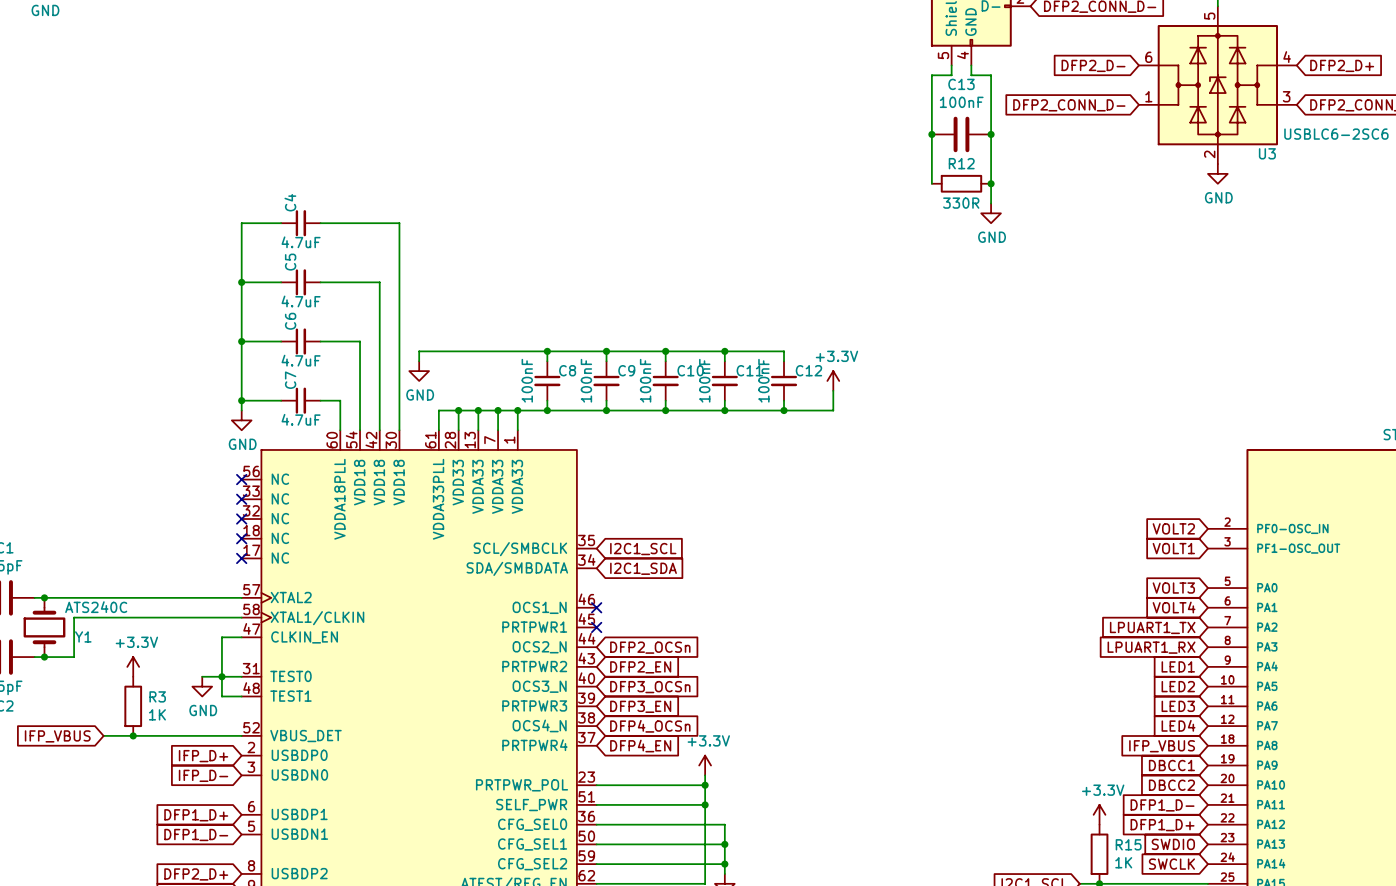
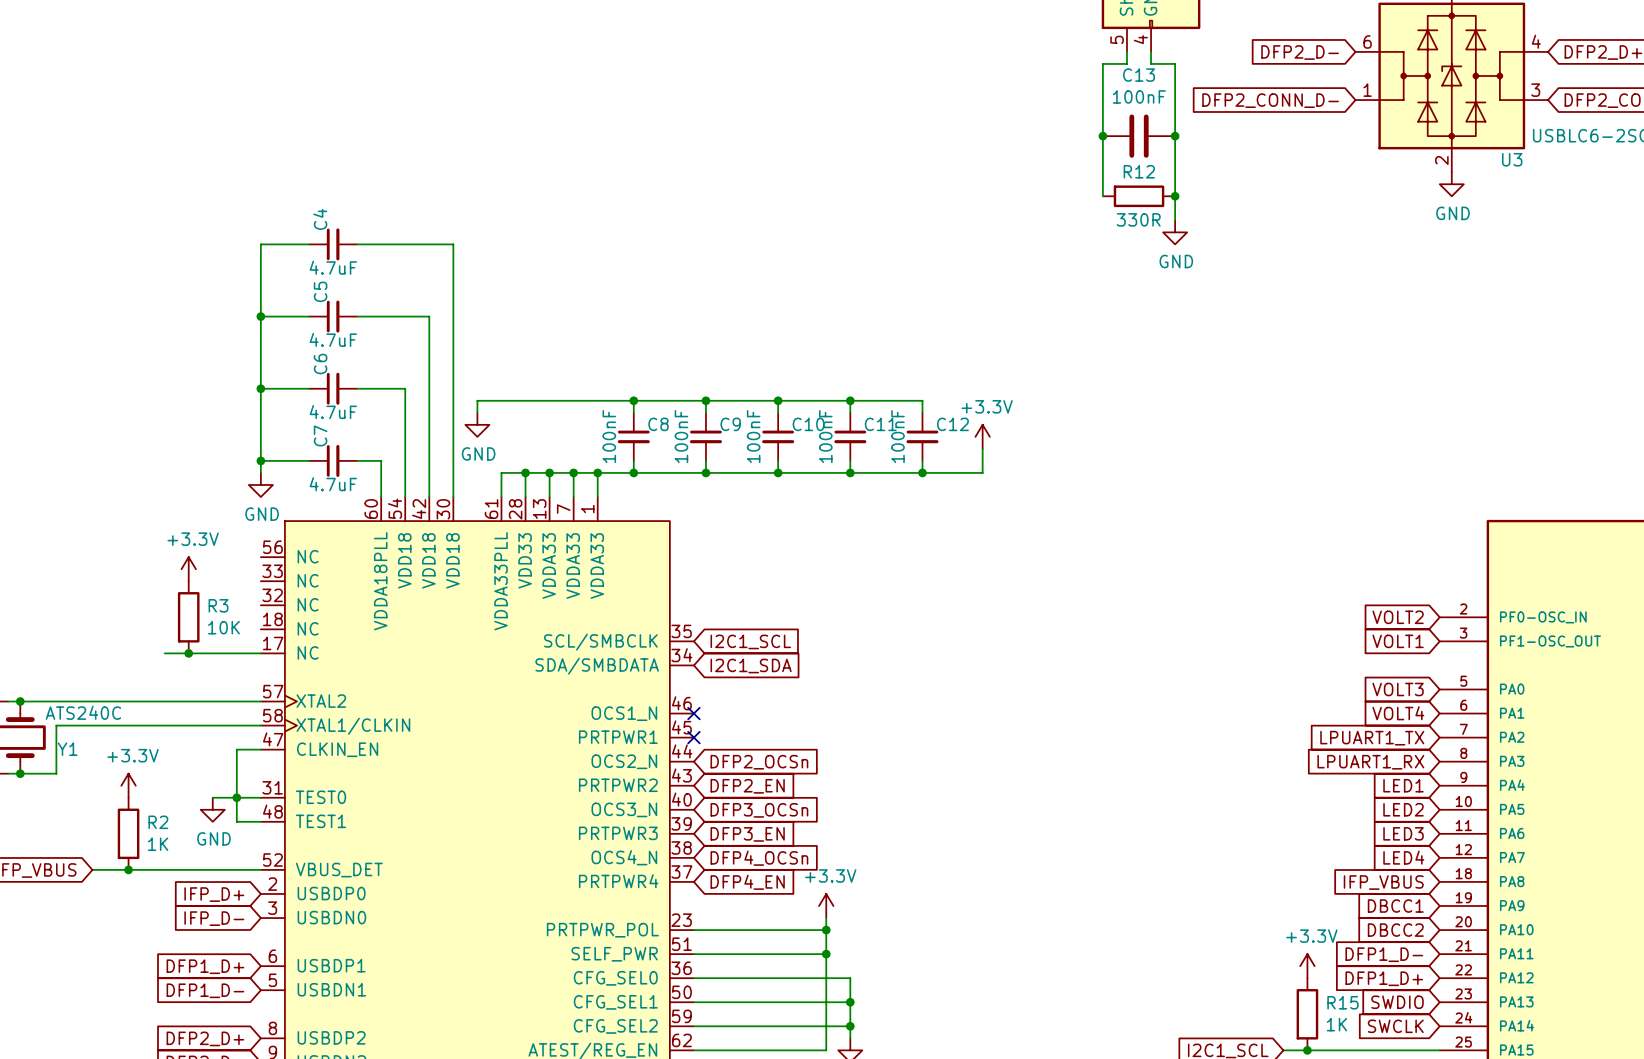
no-connect mark: (241, 479) -> none
power symbol: none -> +3.3V (188, 569)
no-connect mark: (241, 499) -> none
no-connect mark: (241, 519) -> none
R3: none -> 10K (188, 617)
no-connect mark: (241, 538) -> none
wire: none -> (164, 653) (260, 653)
junction: none -> (188, 653)
no-connect mark: (241, 558) -> none
R3 name: R3 (157, 696) -> R2 (158, 822)

